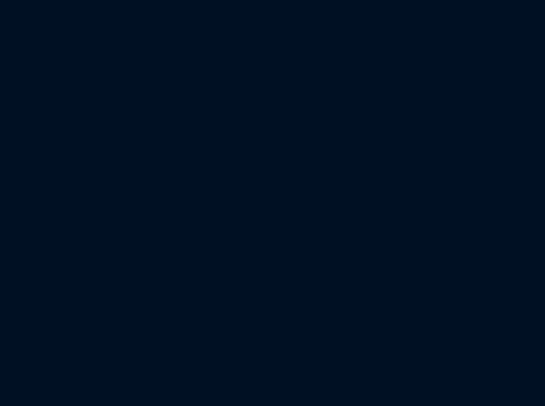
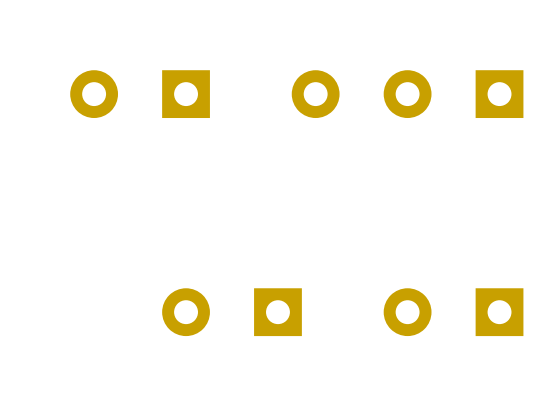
part: none -> (140, 94)
part: none -> (407, 94)
part: none -> (232, 312)
part: none -> (453, 312)

